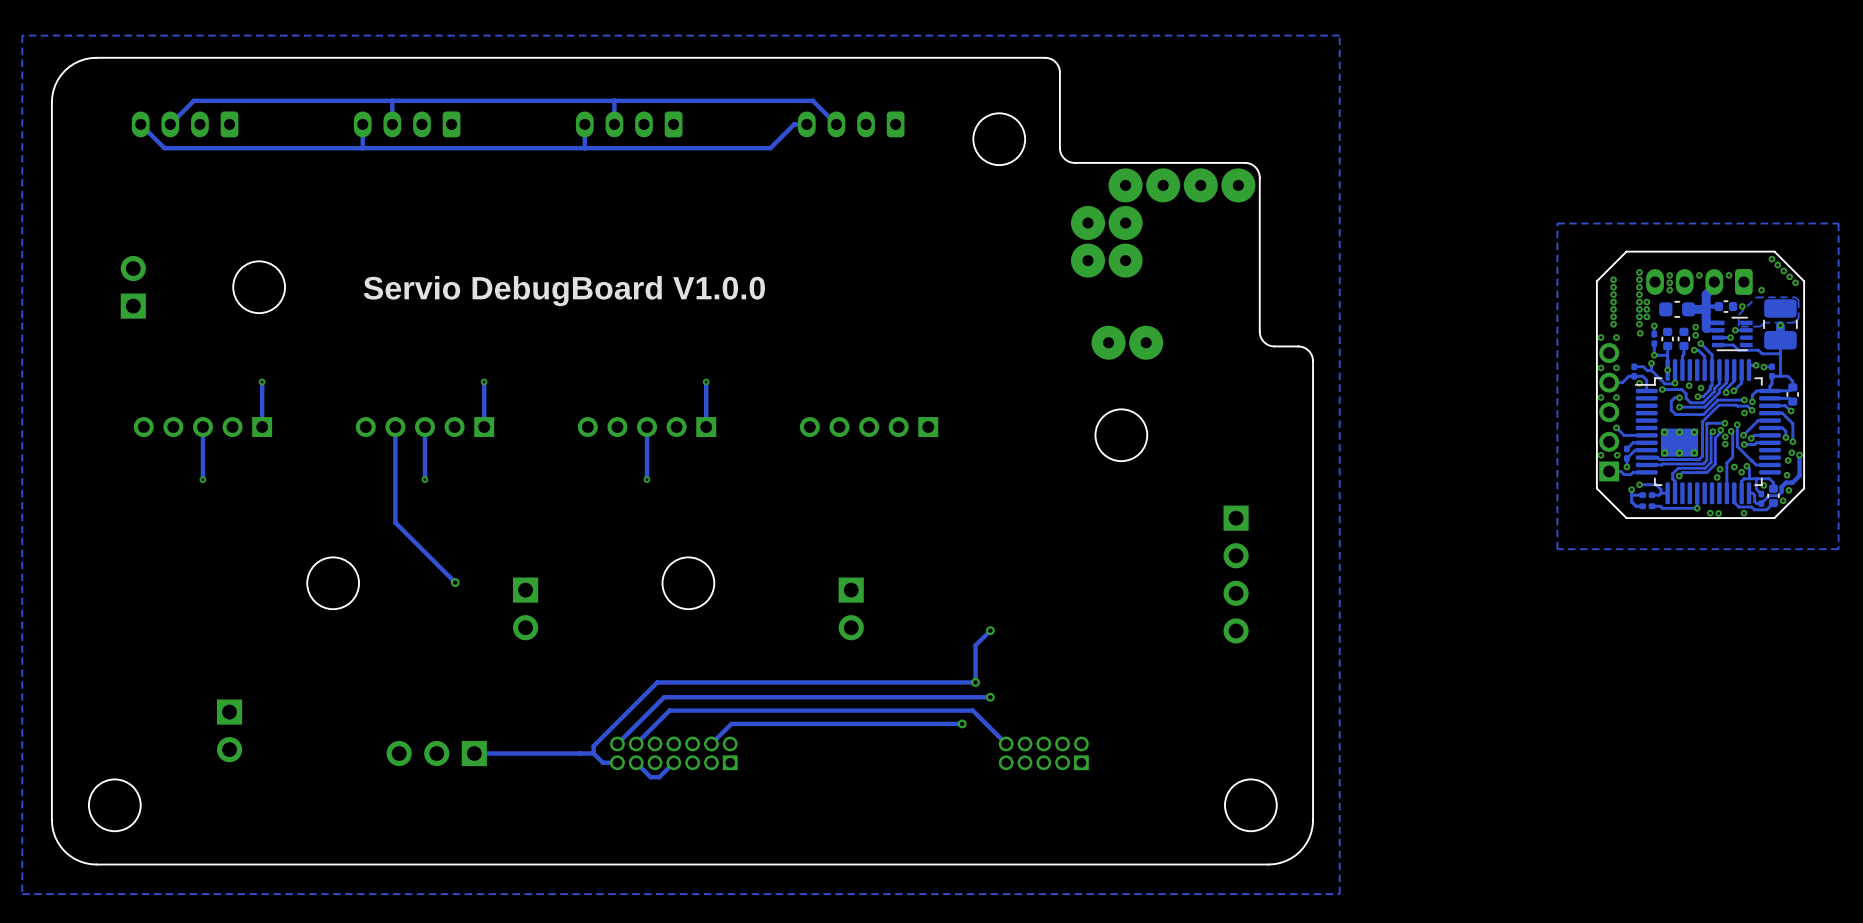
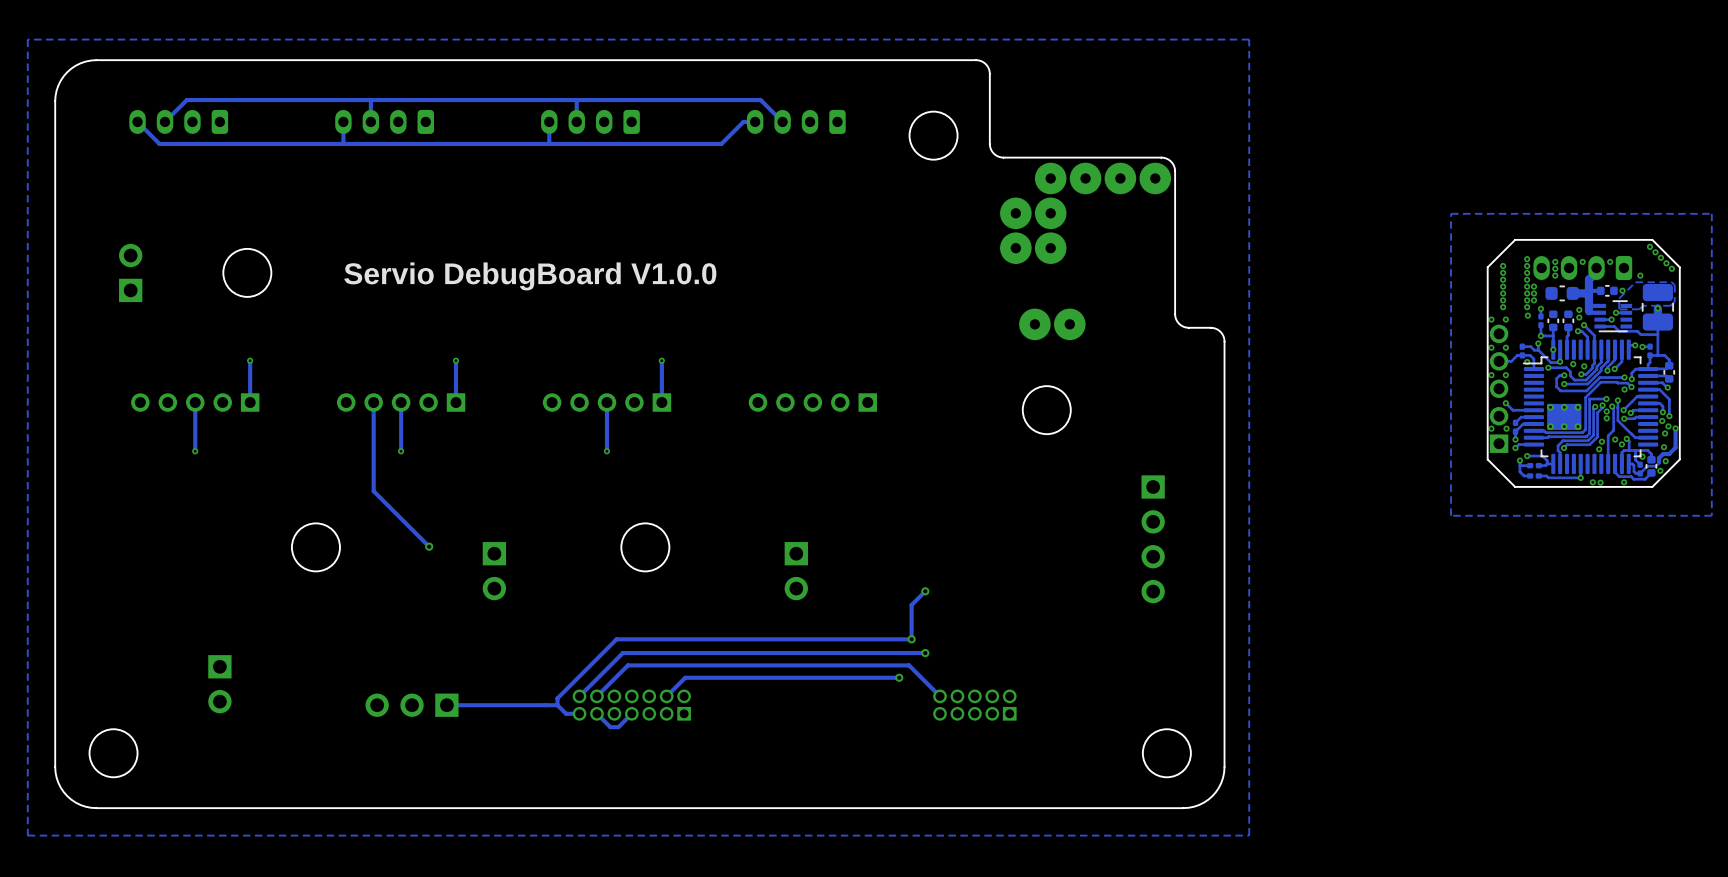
via: none -> (1662, 420)
track: (1609, 471) (1621, 471) (1624, 474) (1631, 474) (1633, 472) -> (1515, 448) (1521, 444)
via: none -> (1515, 448)

